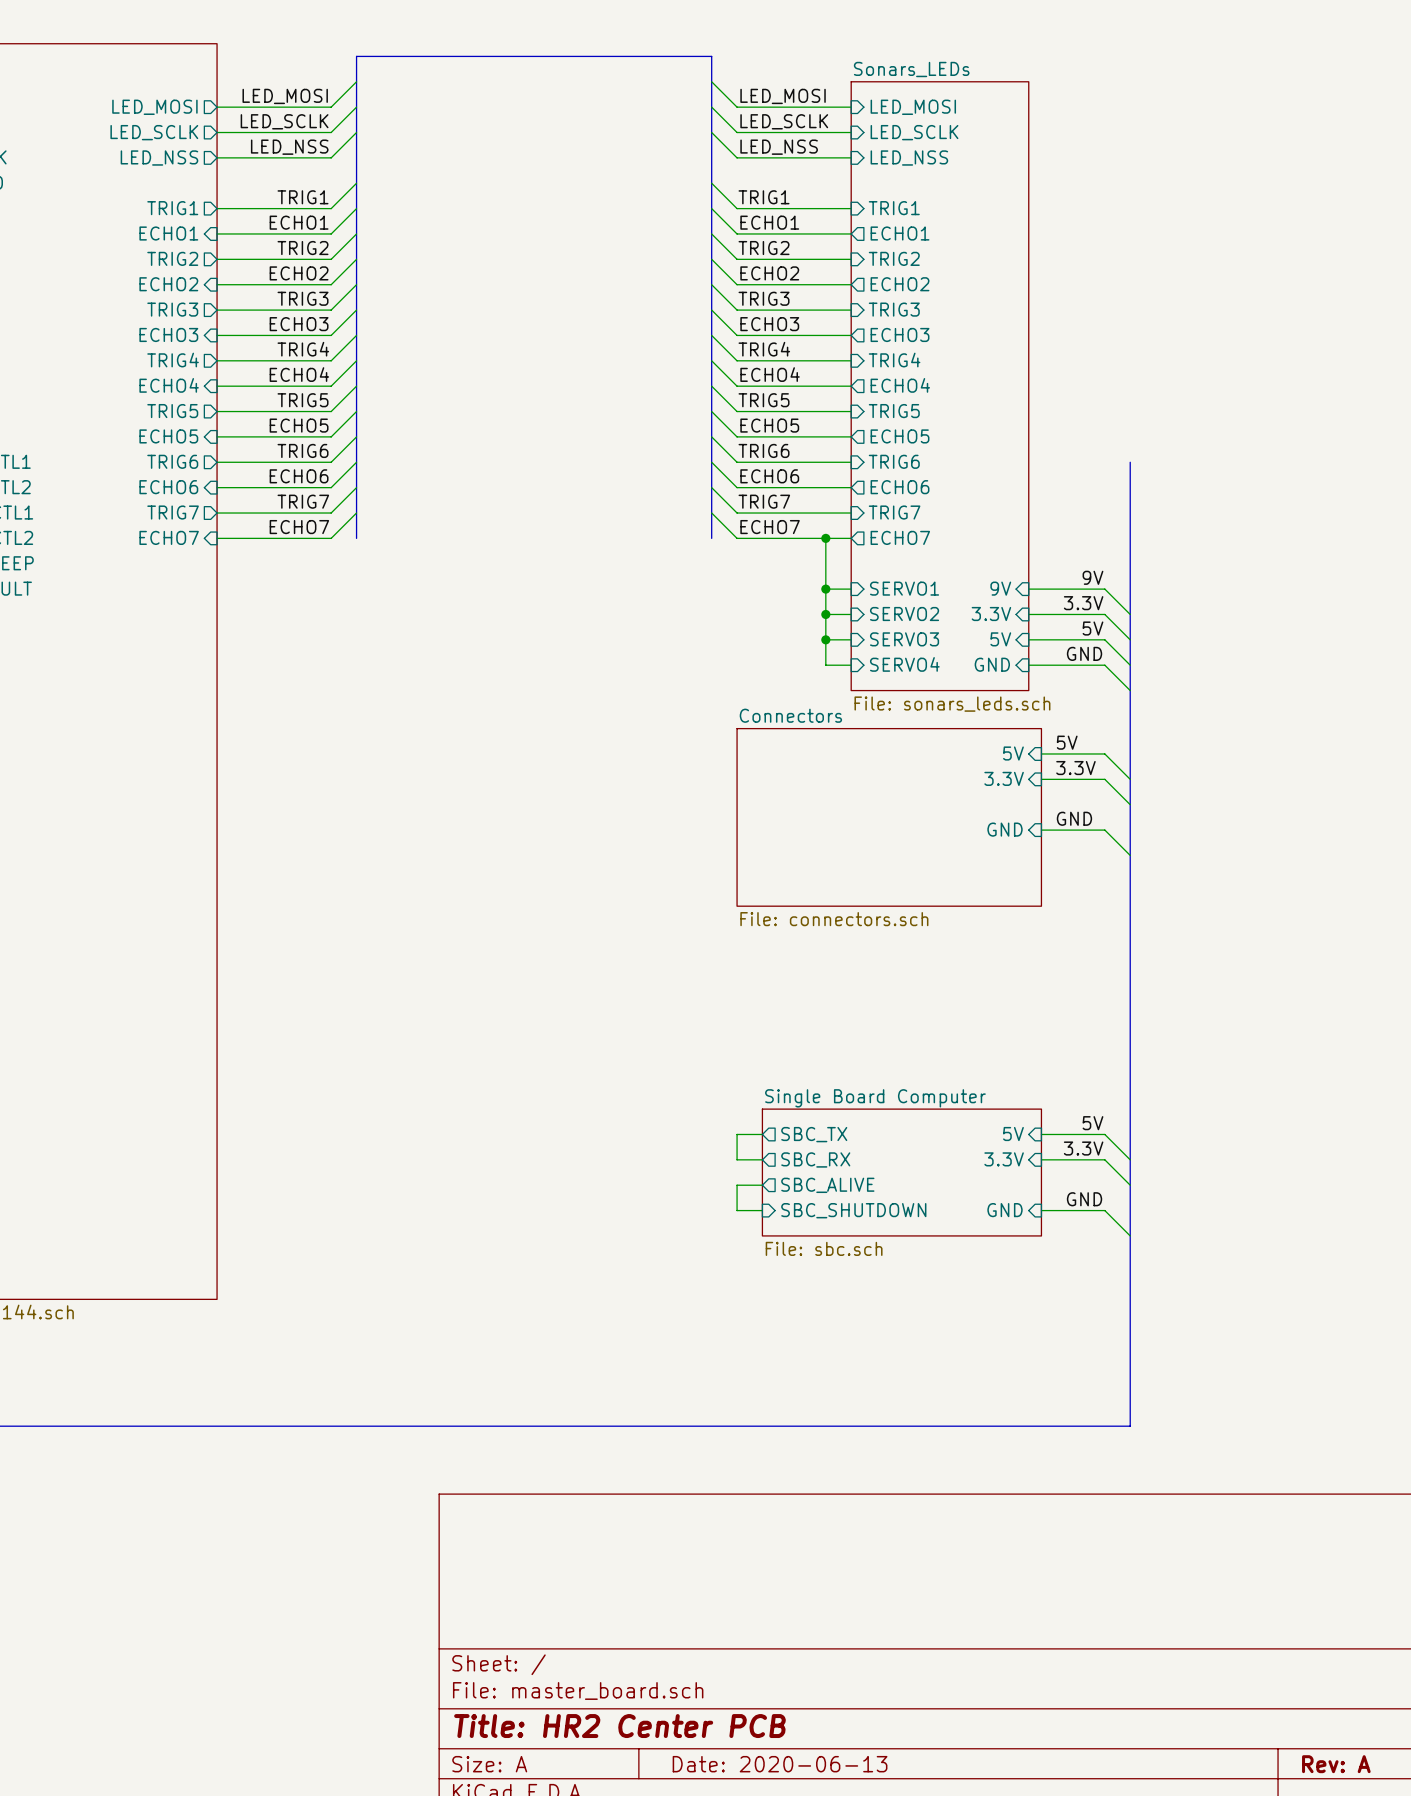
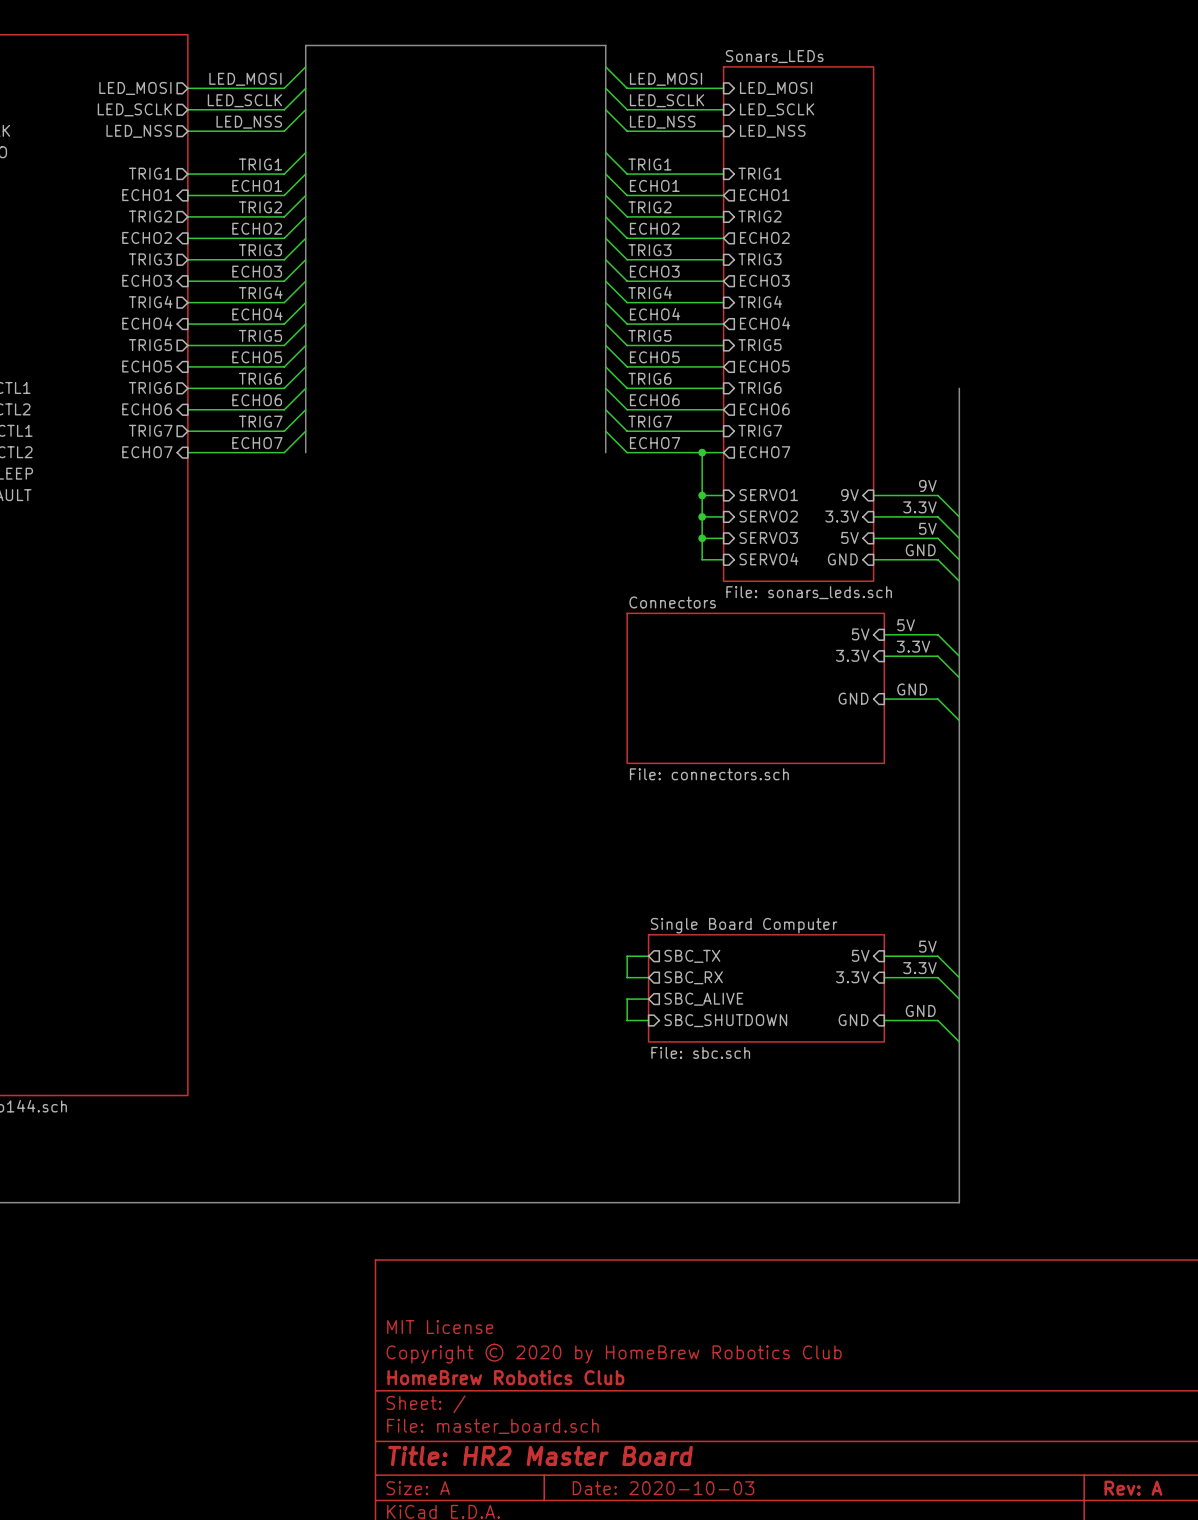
title block: none -> MIT License (440, 1327)
title block: none -> Copyright © 2020 by HomeBrew Robotics Club (614, 1353)
title block: none -> HomeBrew Robotics Club (505, 1377)
title block: Title: HR2 Center PCB (619, 1726) -> Title: HR2 Master Board (540, 1455)
title block: Date: 2020-06-13 (780, 1764) -> Date: 2020-10-03 (663, 1488)

